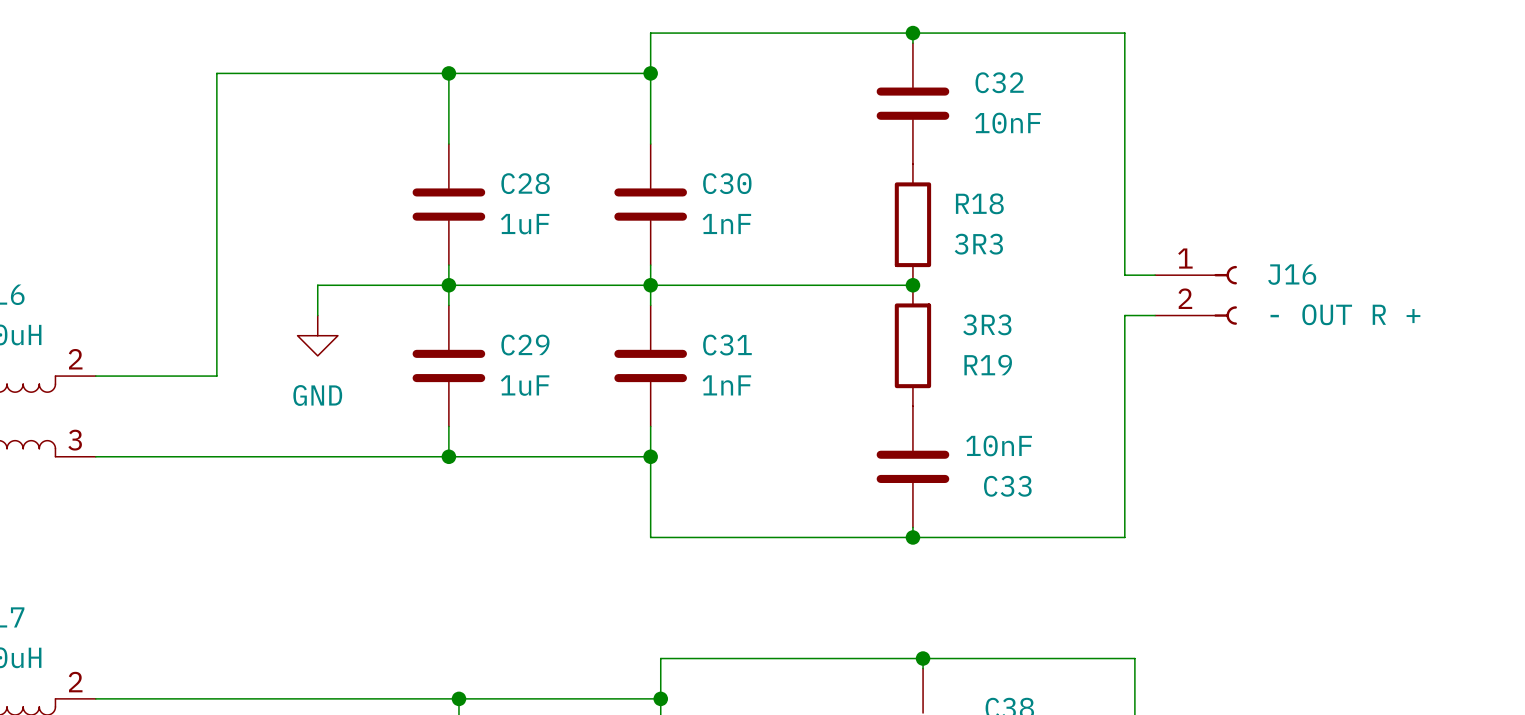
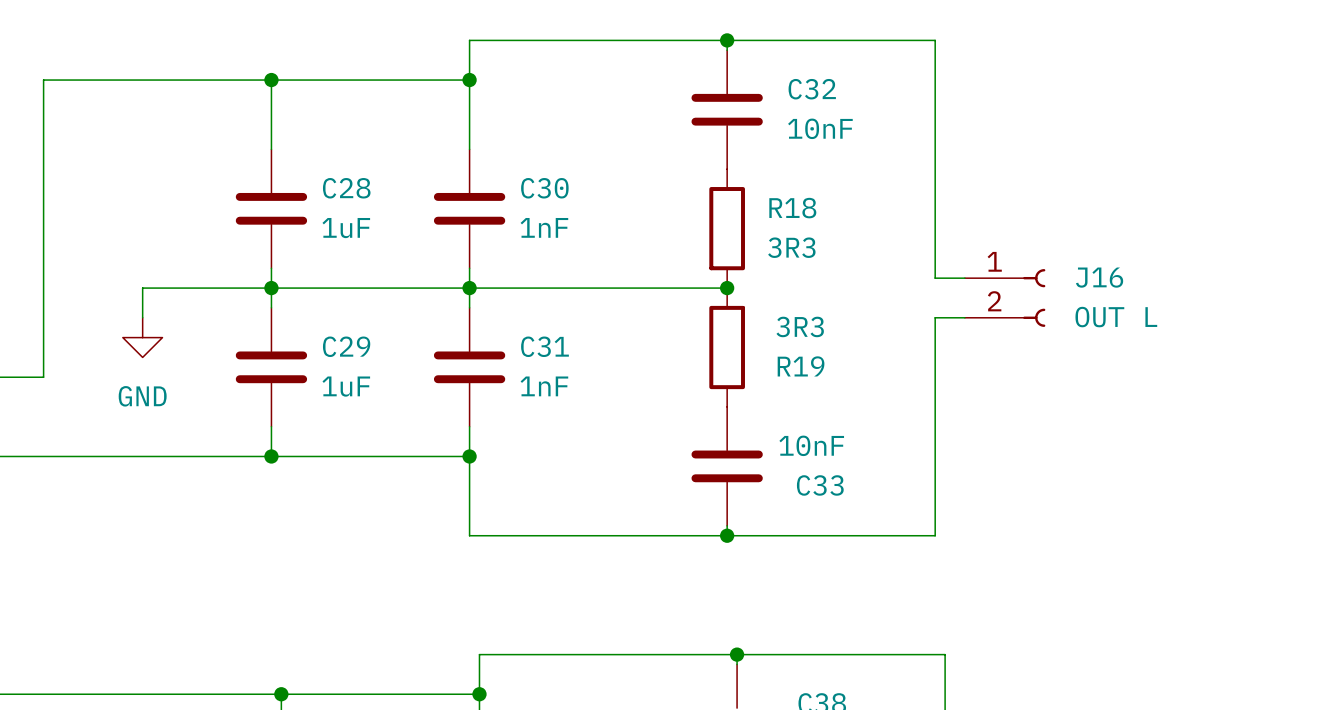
J16 value: - OUT R + (1345, 314) -> OUT L (1116, 317)

